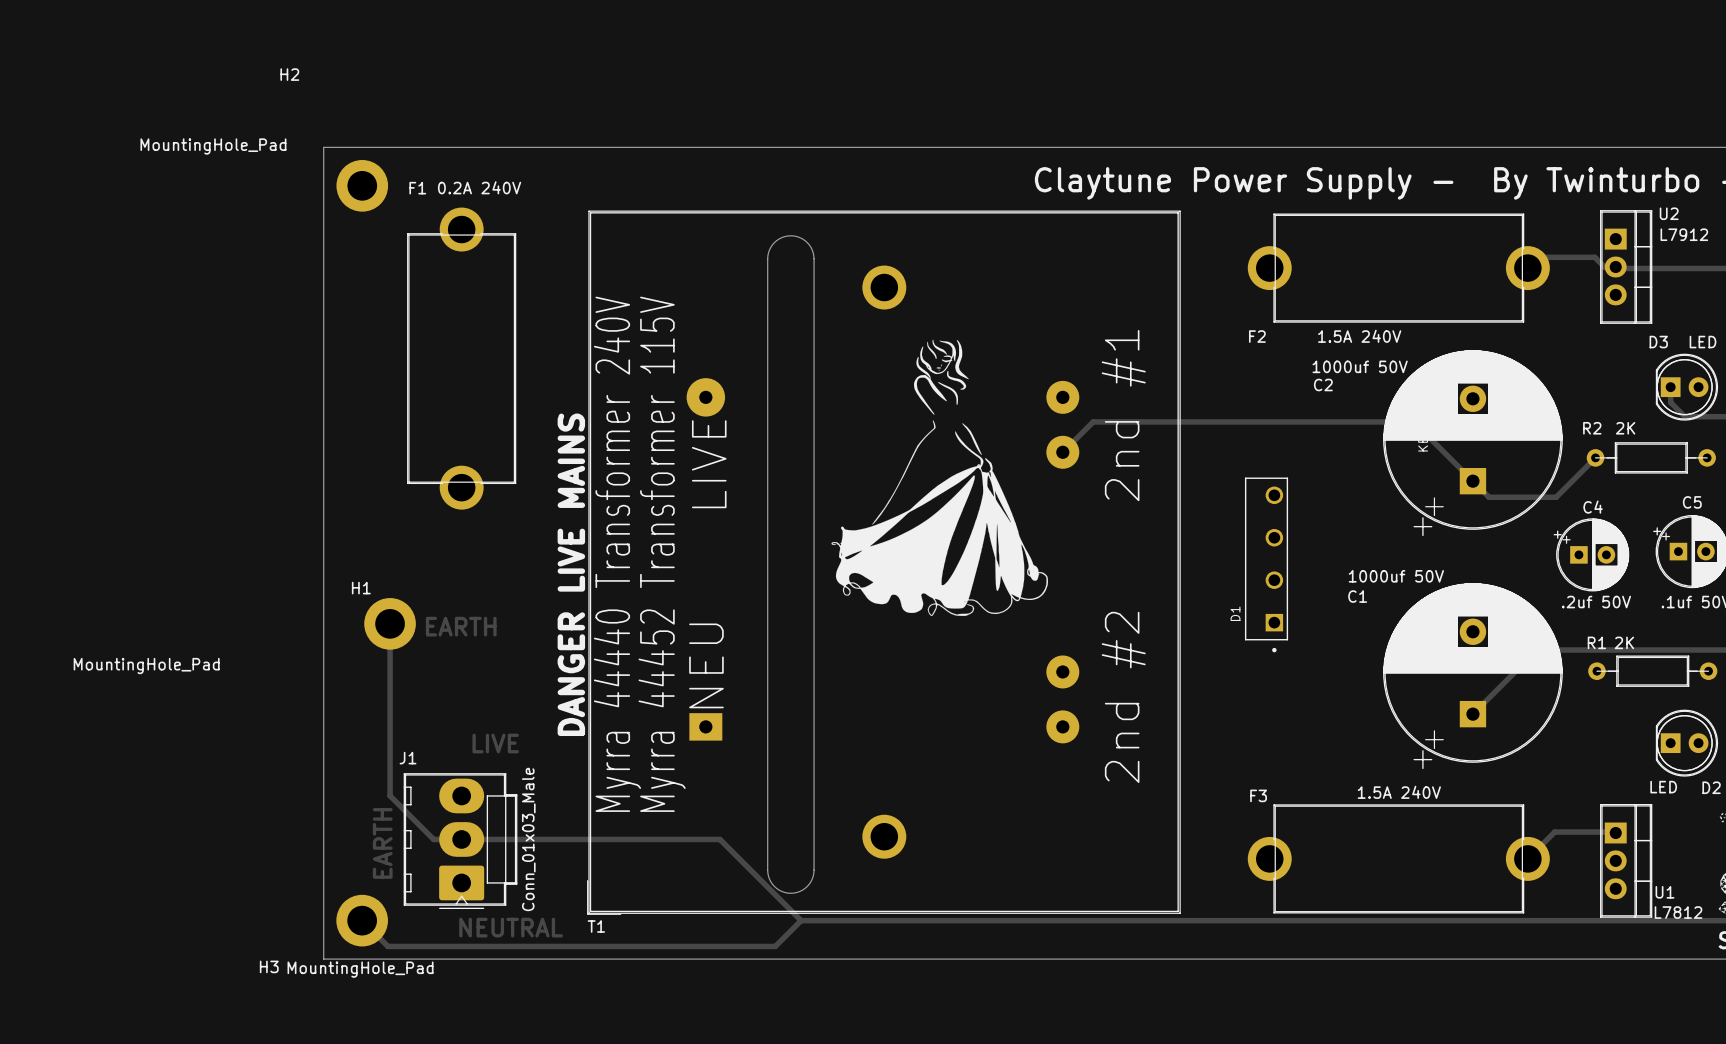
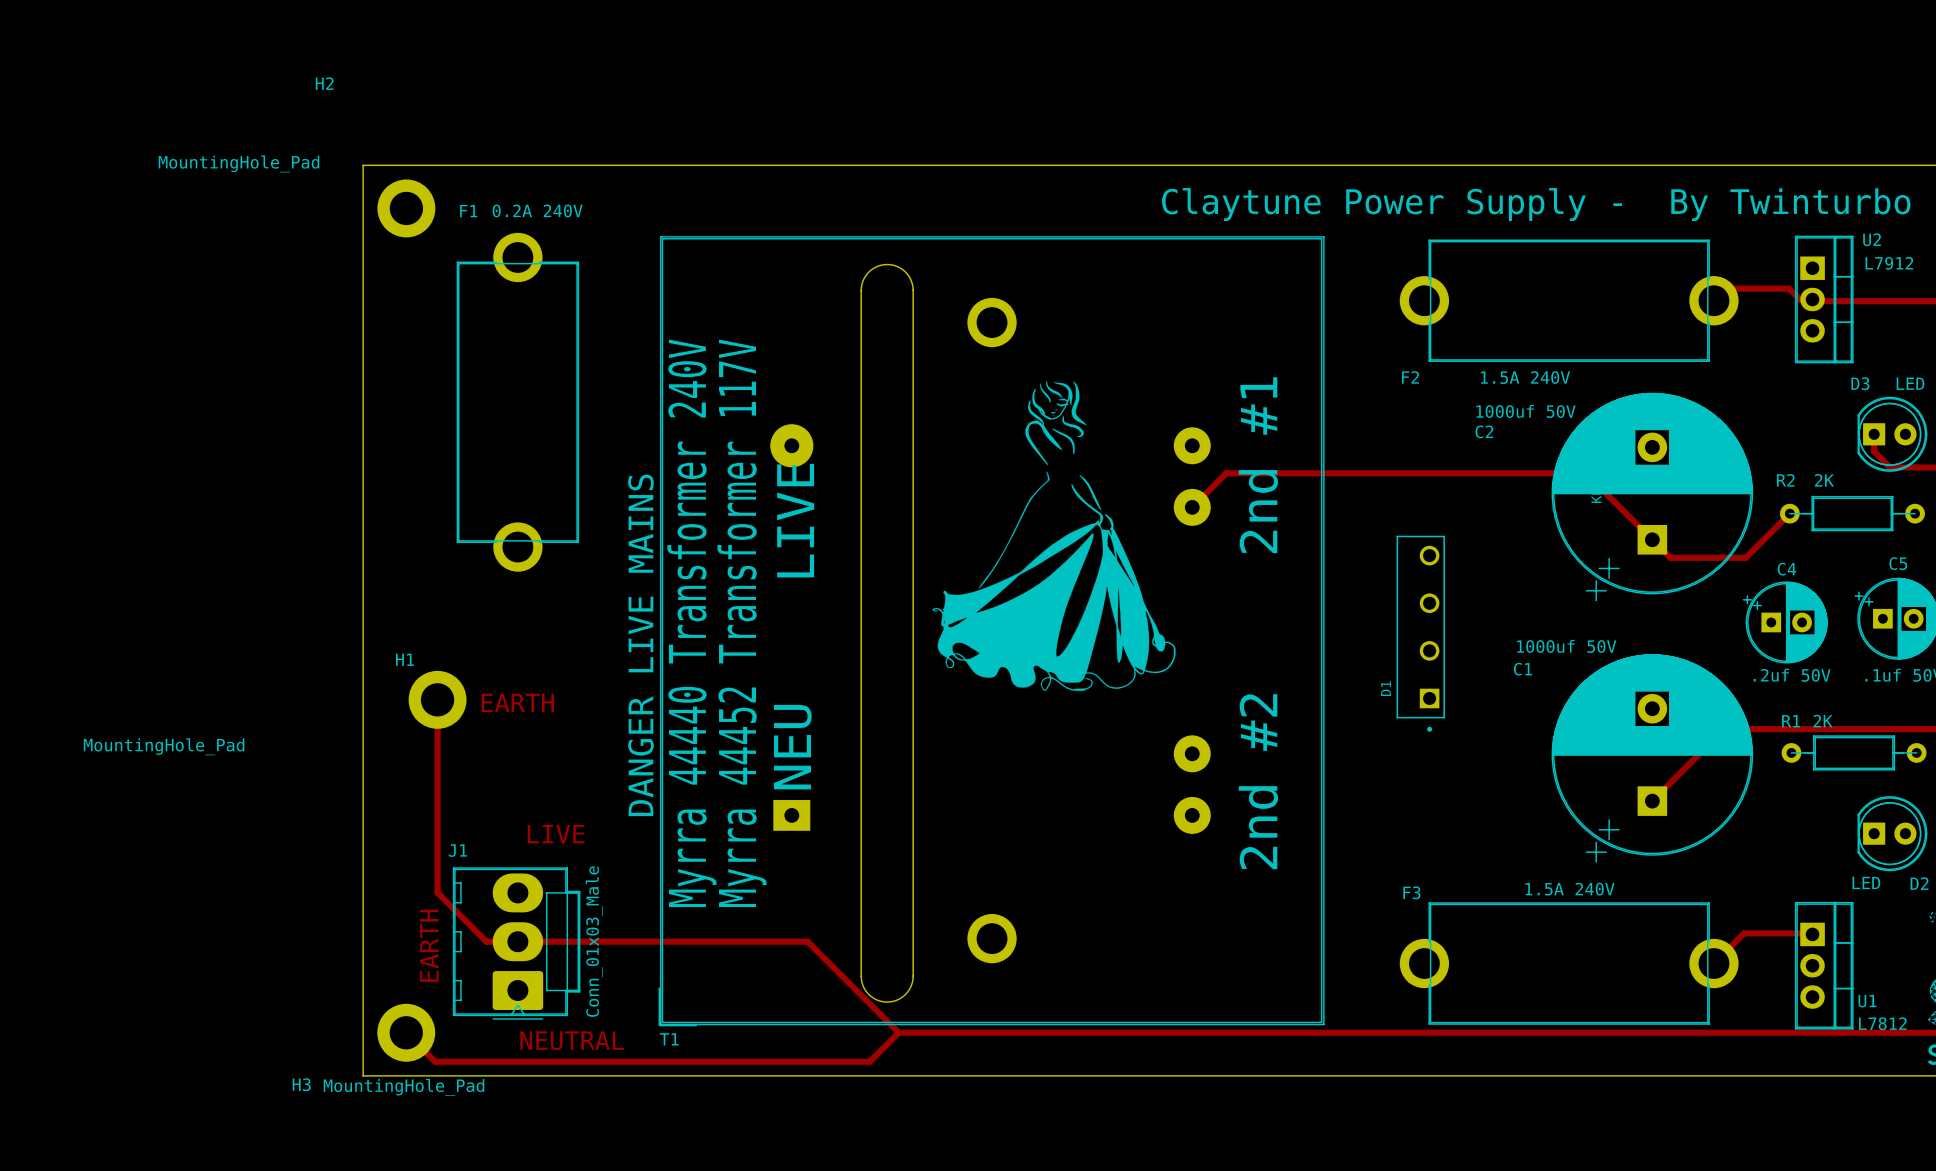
text: Myrra 44452 Transformer 115V (662, 554) -> Myrra 44452 Transformer 117V (741, 623)

